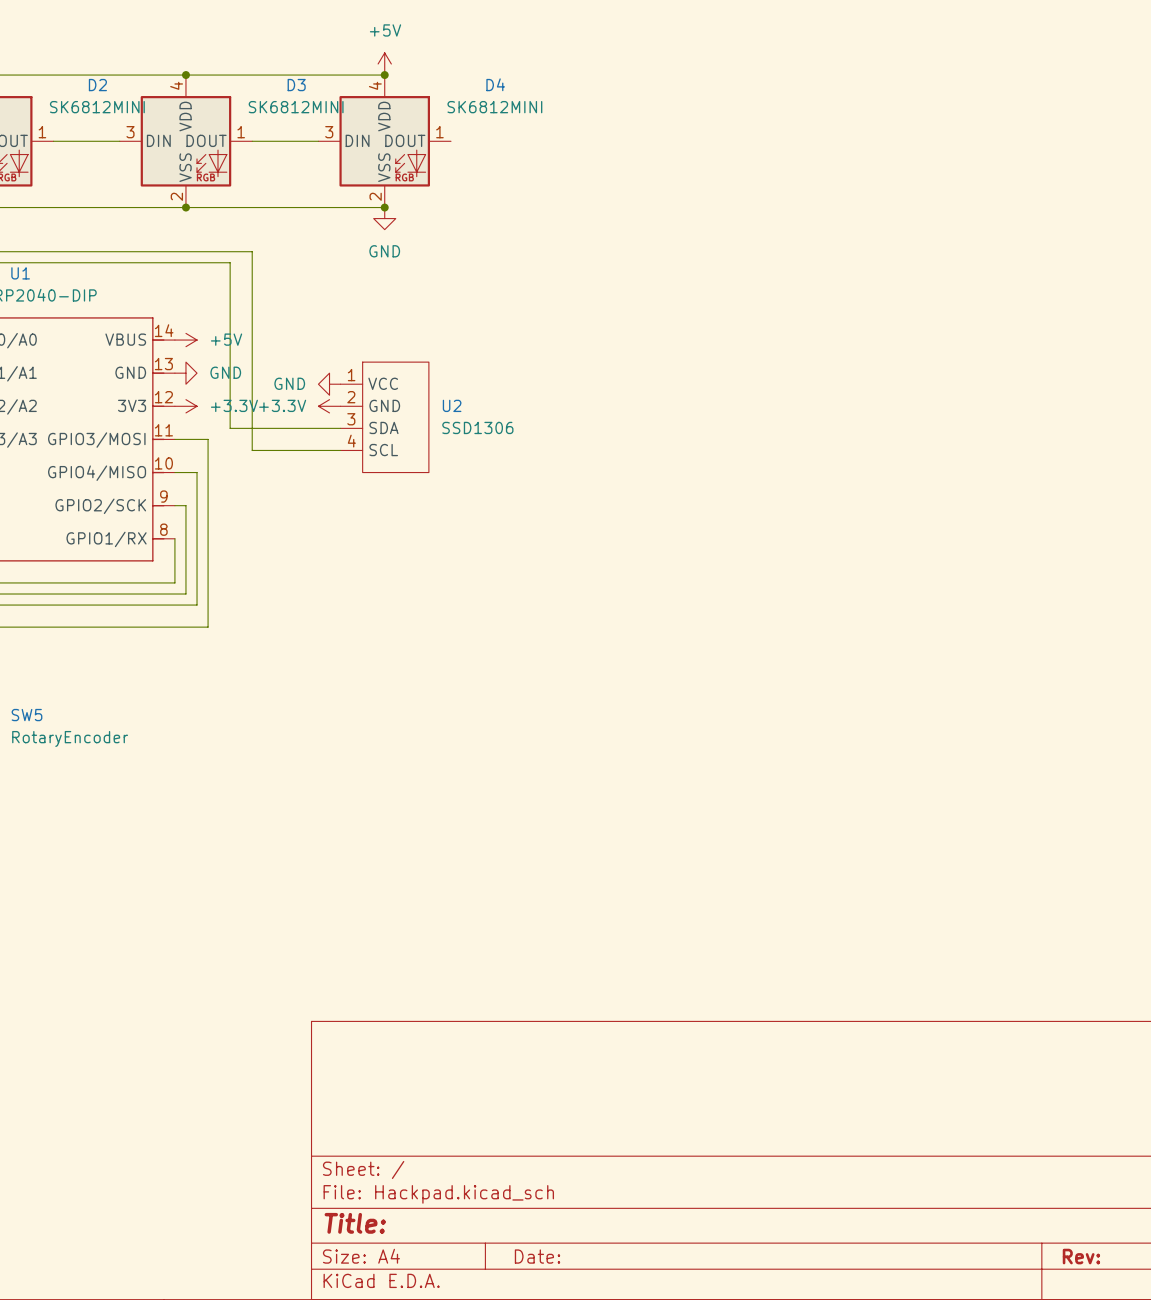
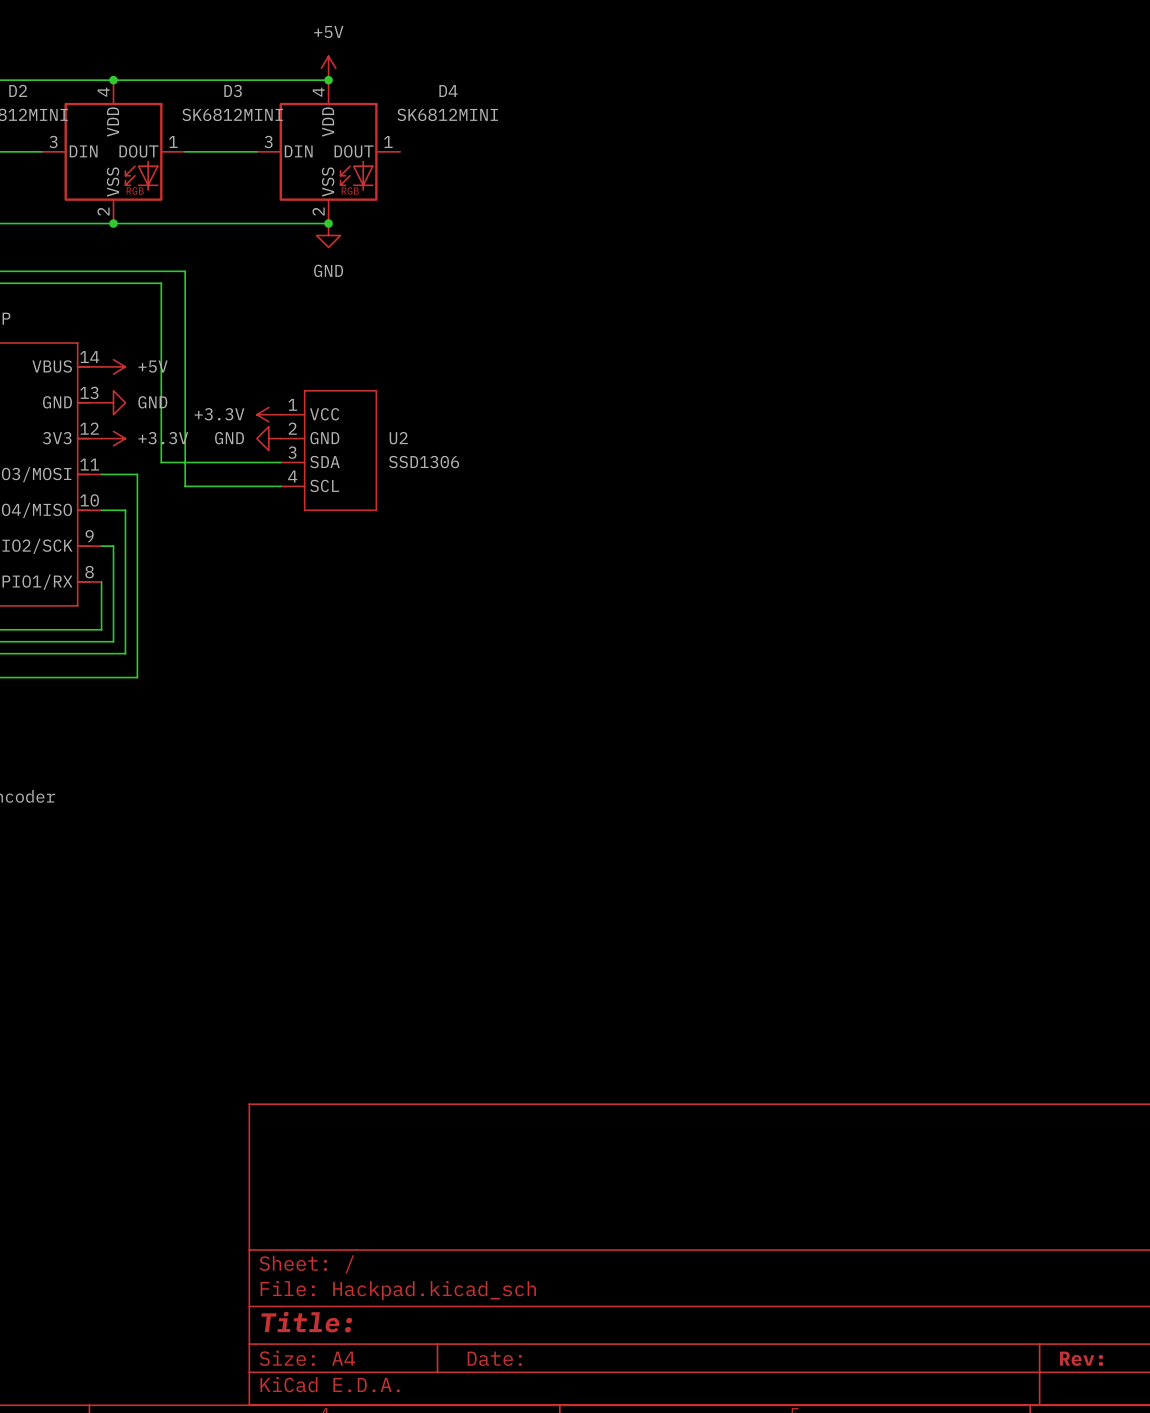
power symbol: GND (329, 384) -> +3.3V (268, 414)
power symbol: +3.3V (329, 406) -> GND (268, 438)

